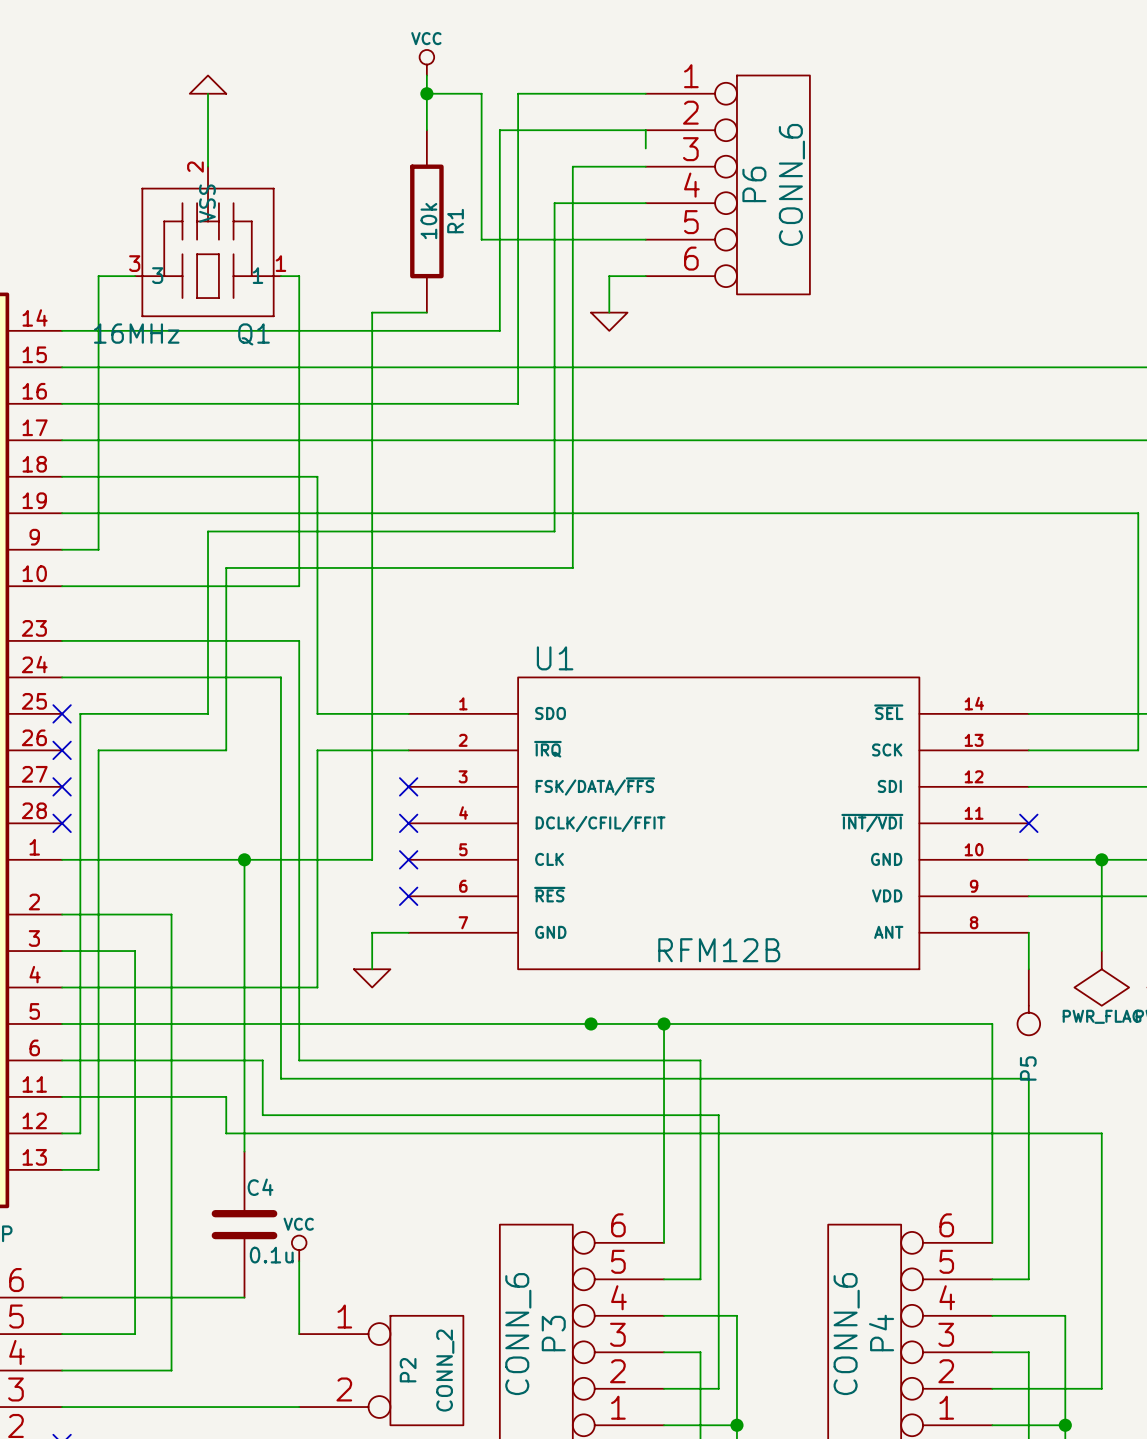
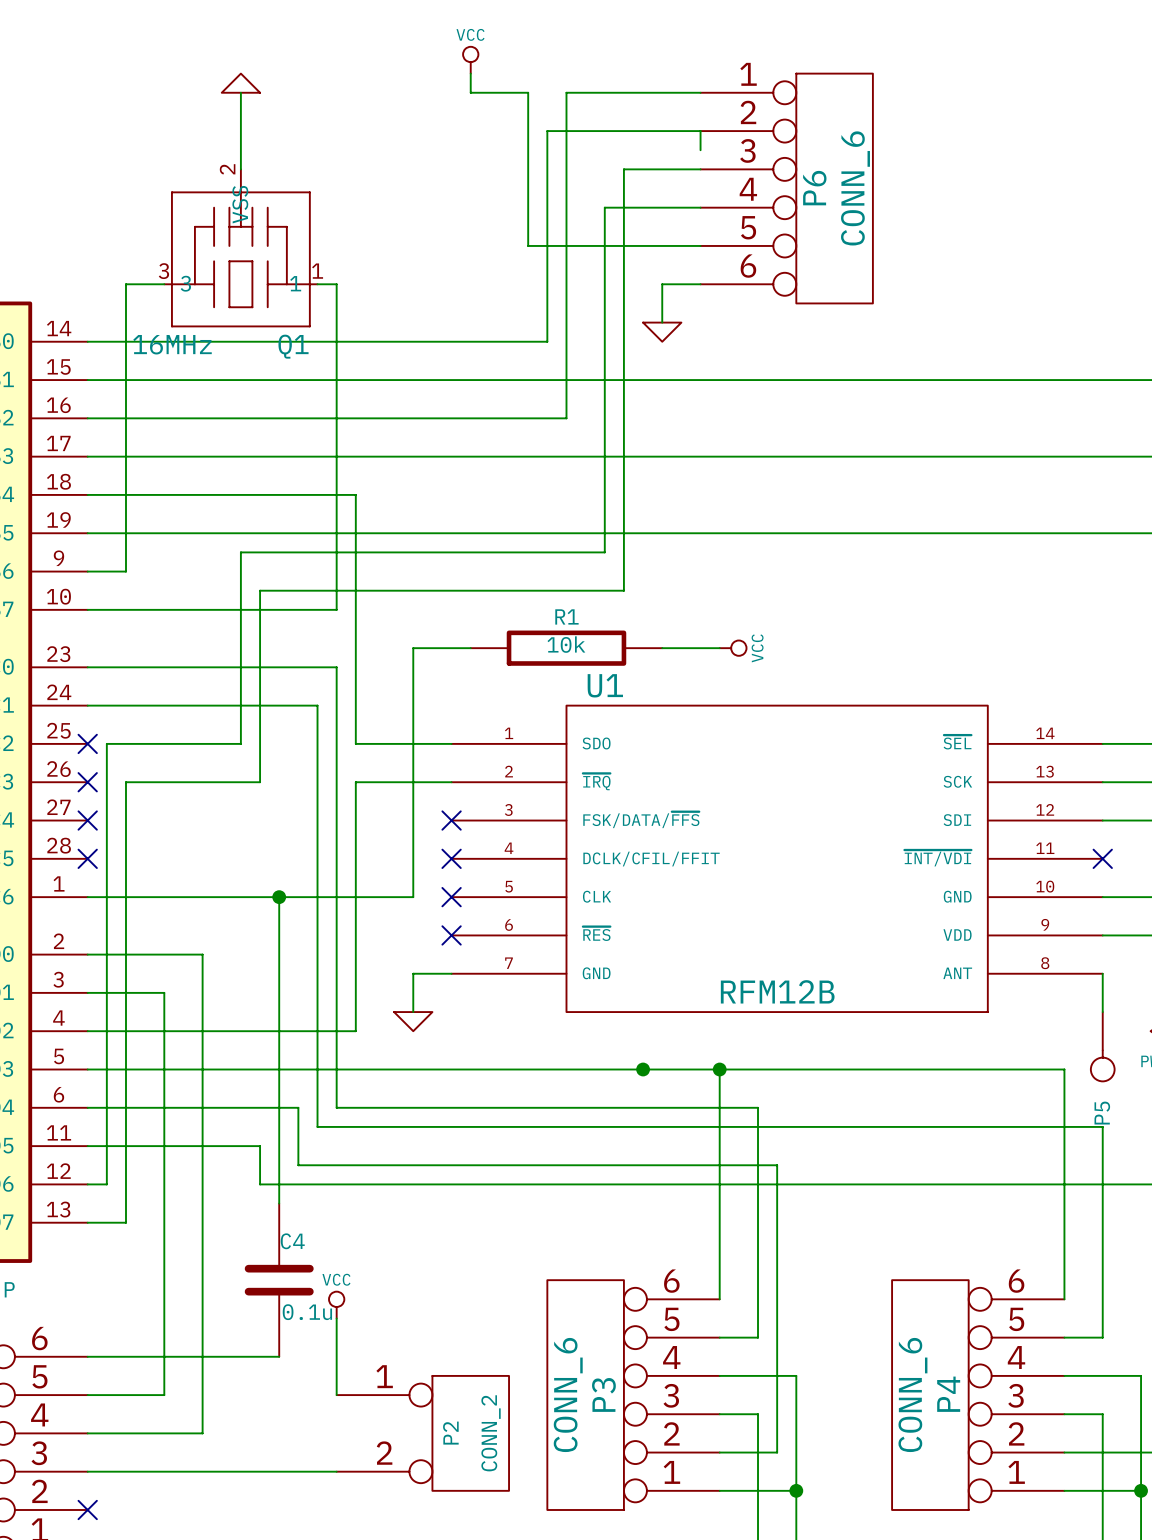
wire: (426, 93) (426, 130) -> none
junction: (426, 93) -> none
R1 rotation: 0° (426, 221) -> 90° clockwise (566, 648)
R1 position: (426, 221) -> (566, 648)
R1 name position: R1 (455, 221) -> R1 (566, 616)
wire: (426, 312) (372, 312) (372, 622) -> (470, 648) (413, 648)
wire: none -> (662, 648) (719, 648)
power symbol: none -> VCC (733, 648)

